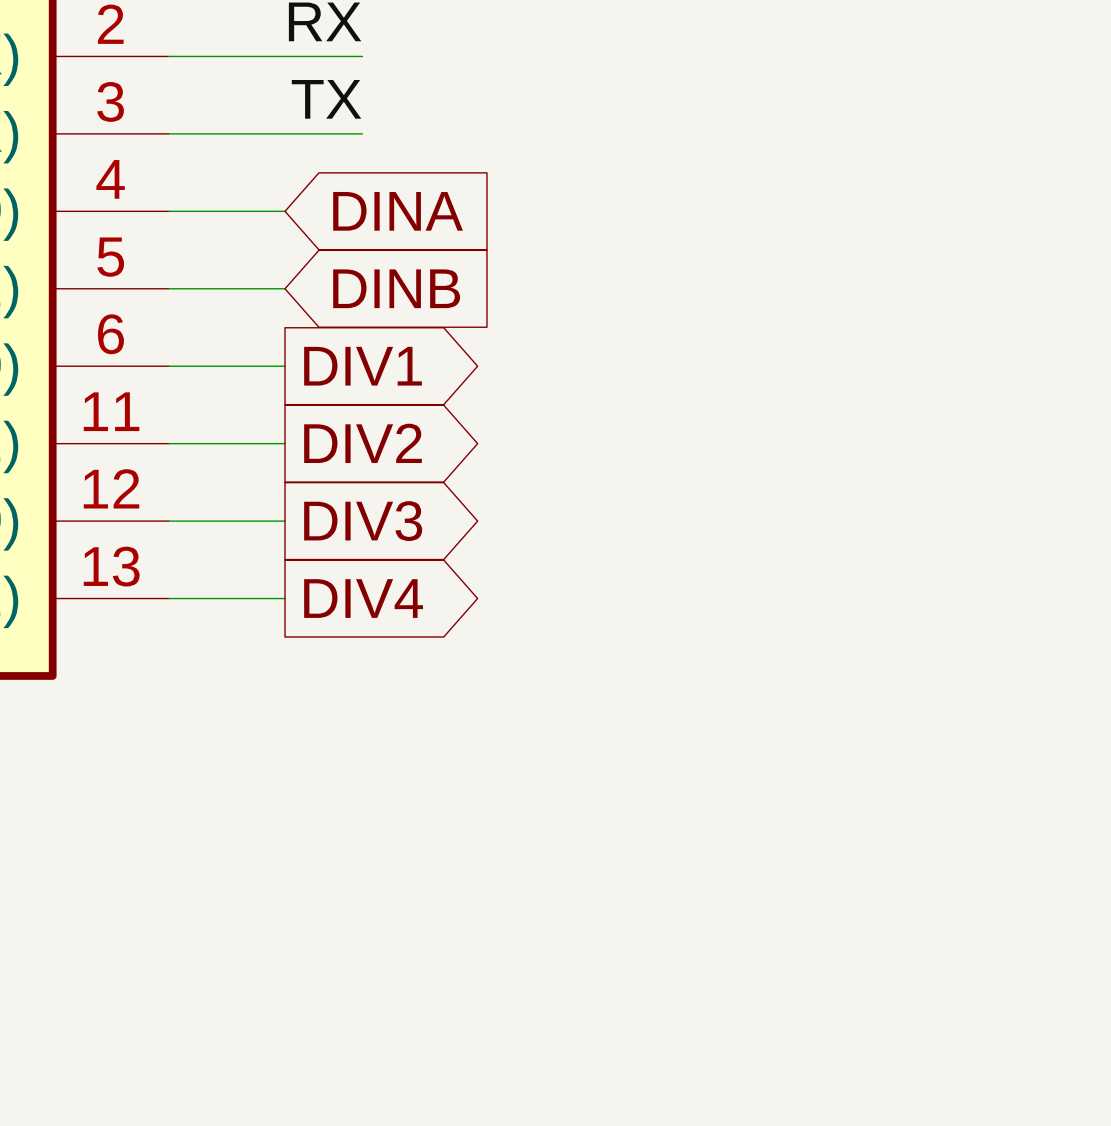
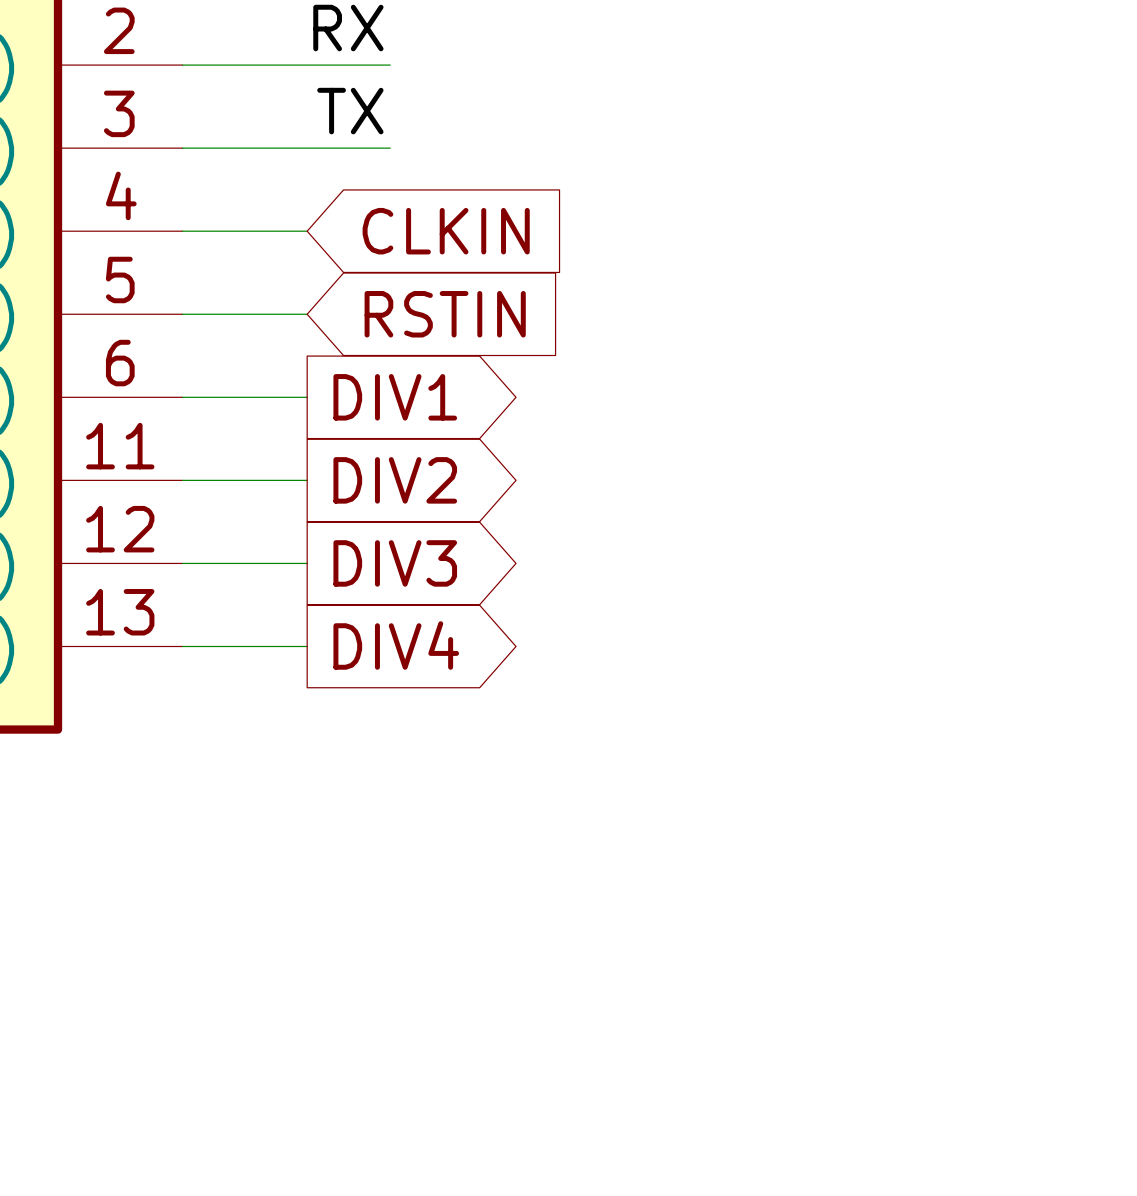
global label: DINA (398, 211) -> CLKIN (446, 231)
global label: DINB (396, 288) -> RSTIN (445, 314)

